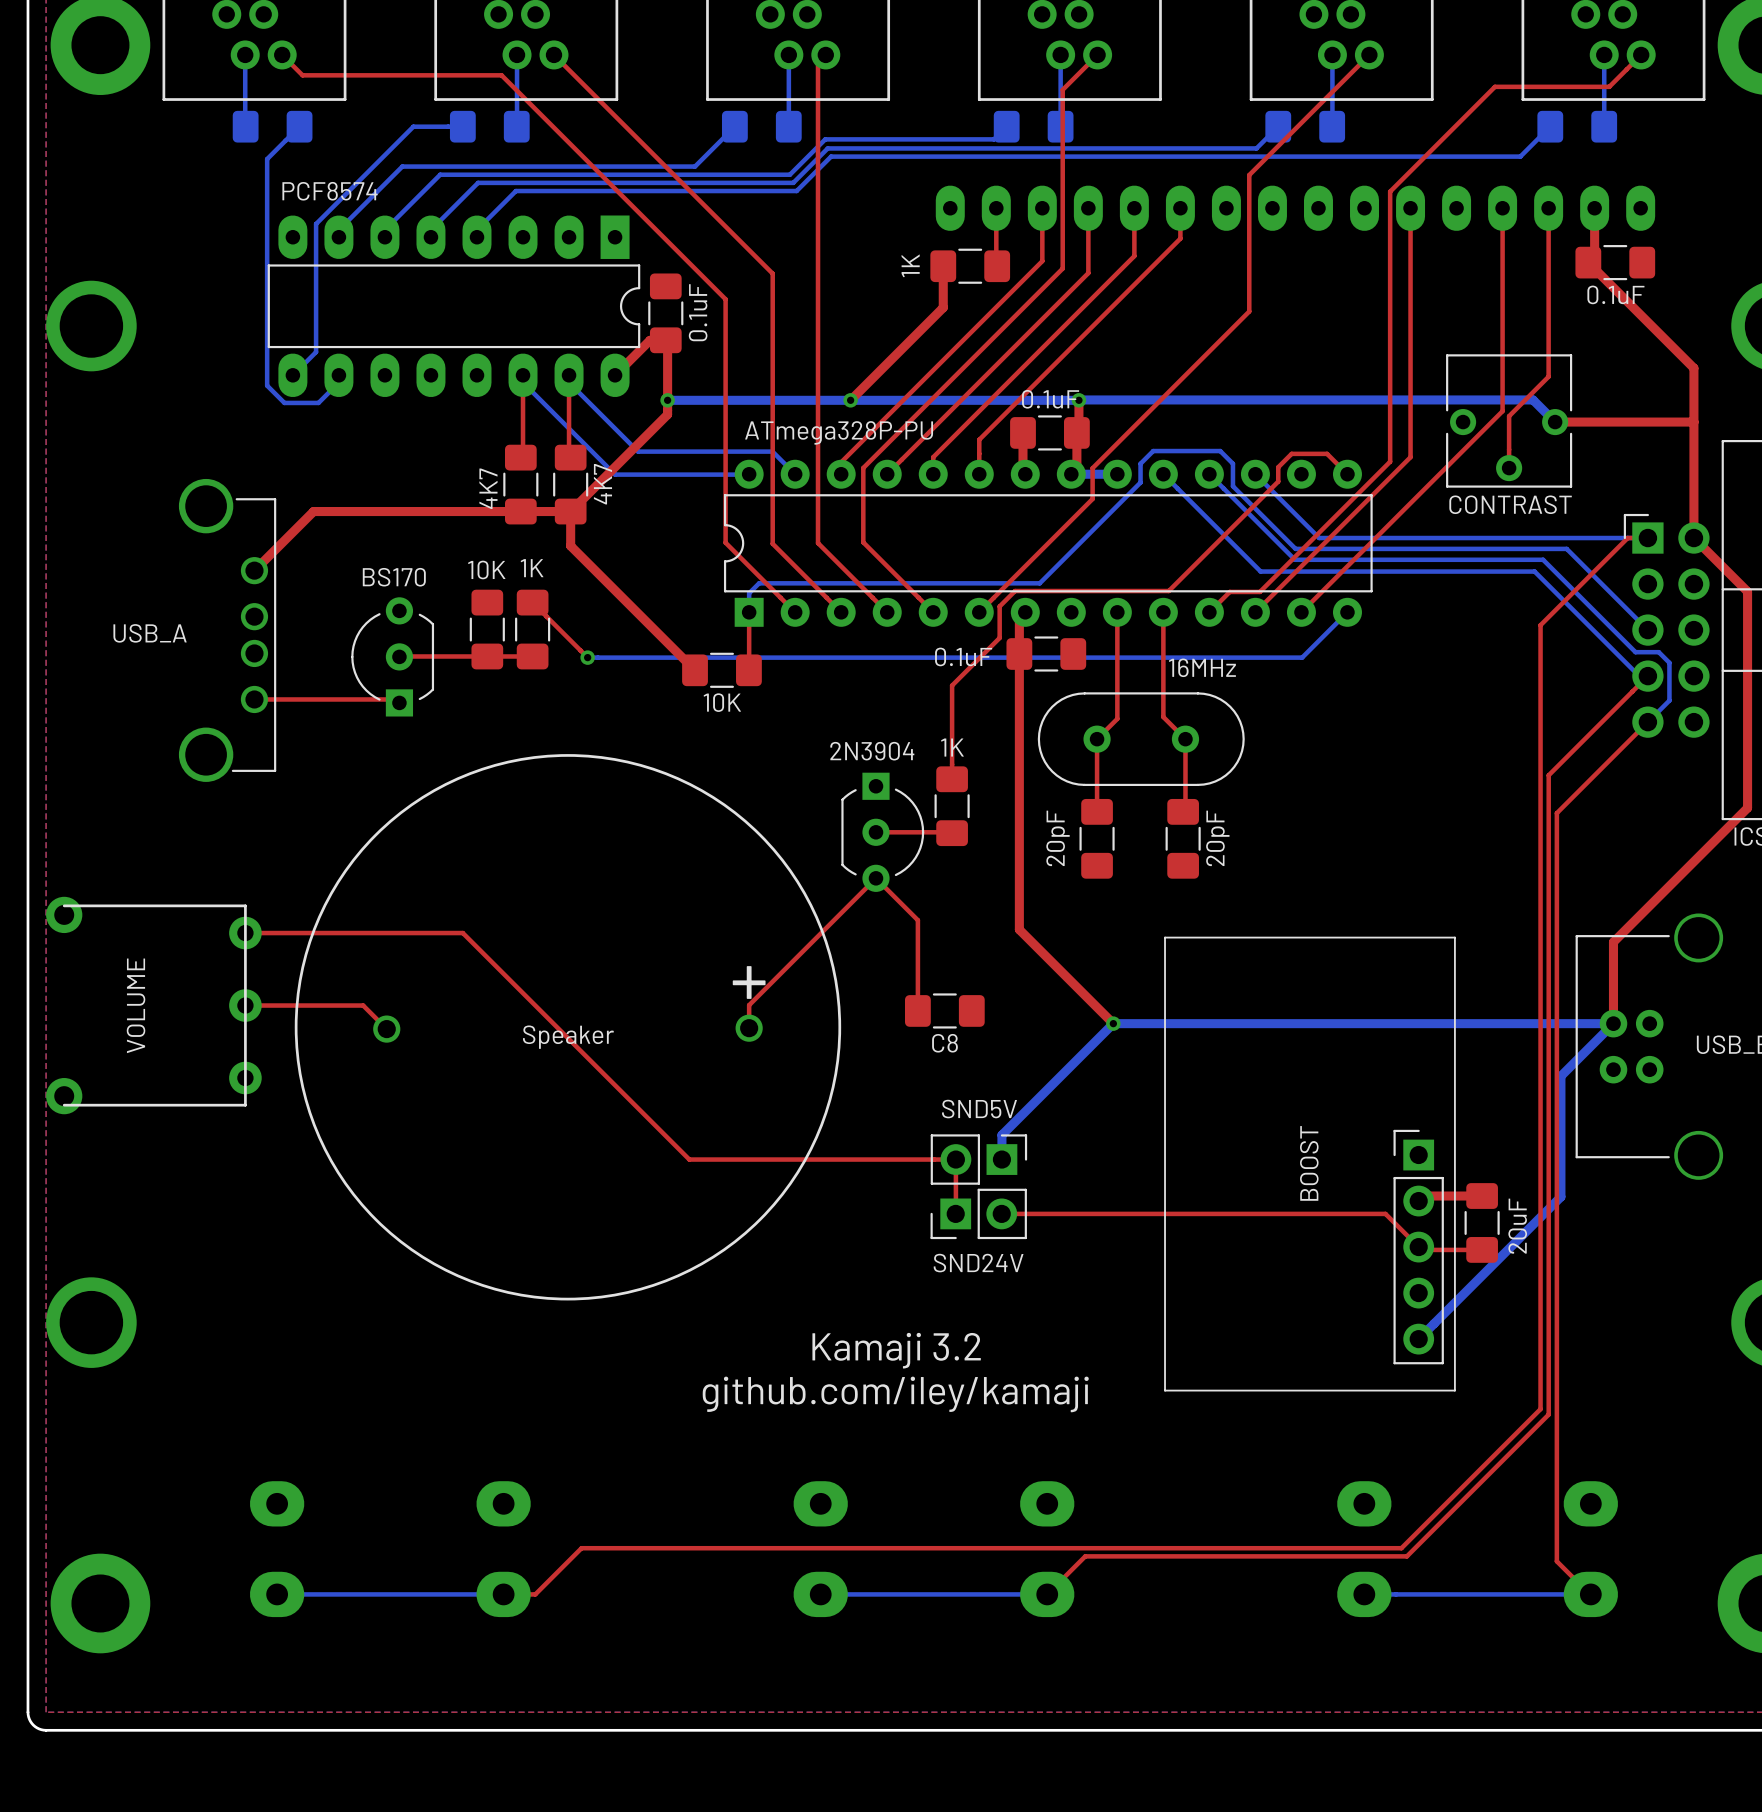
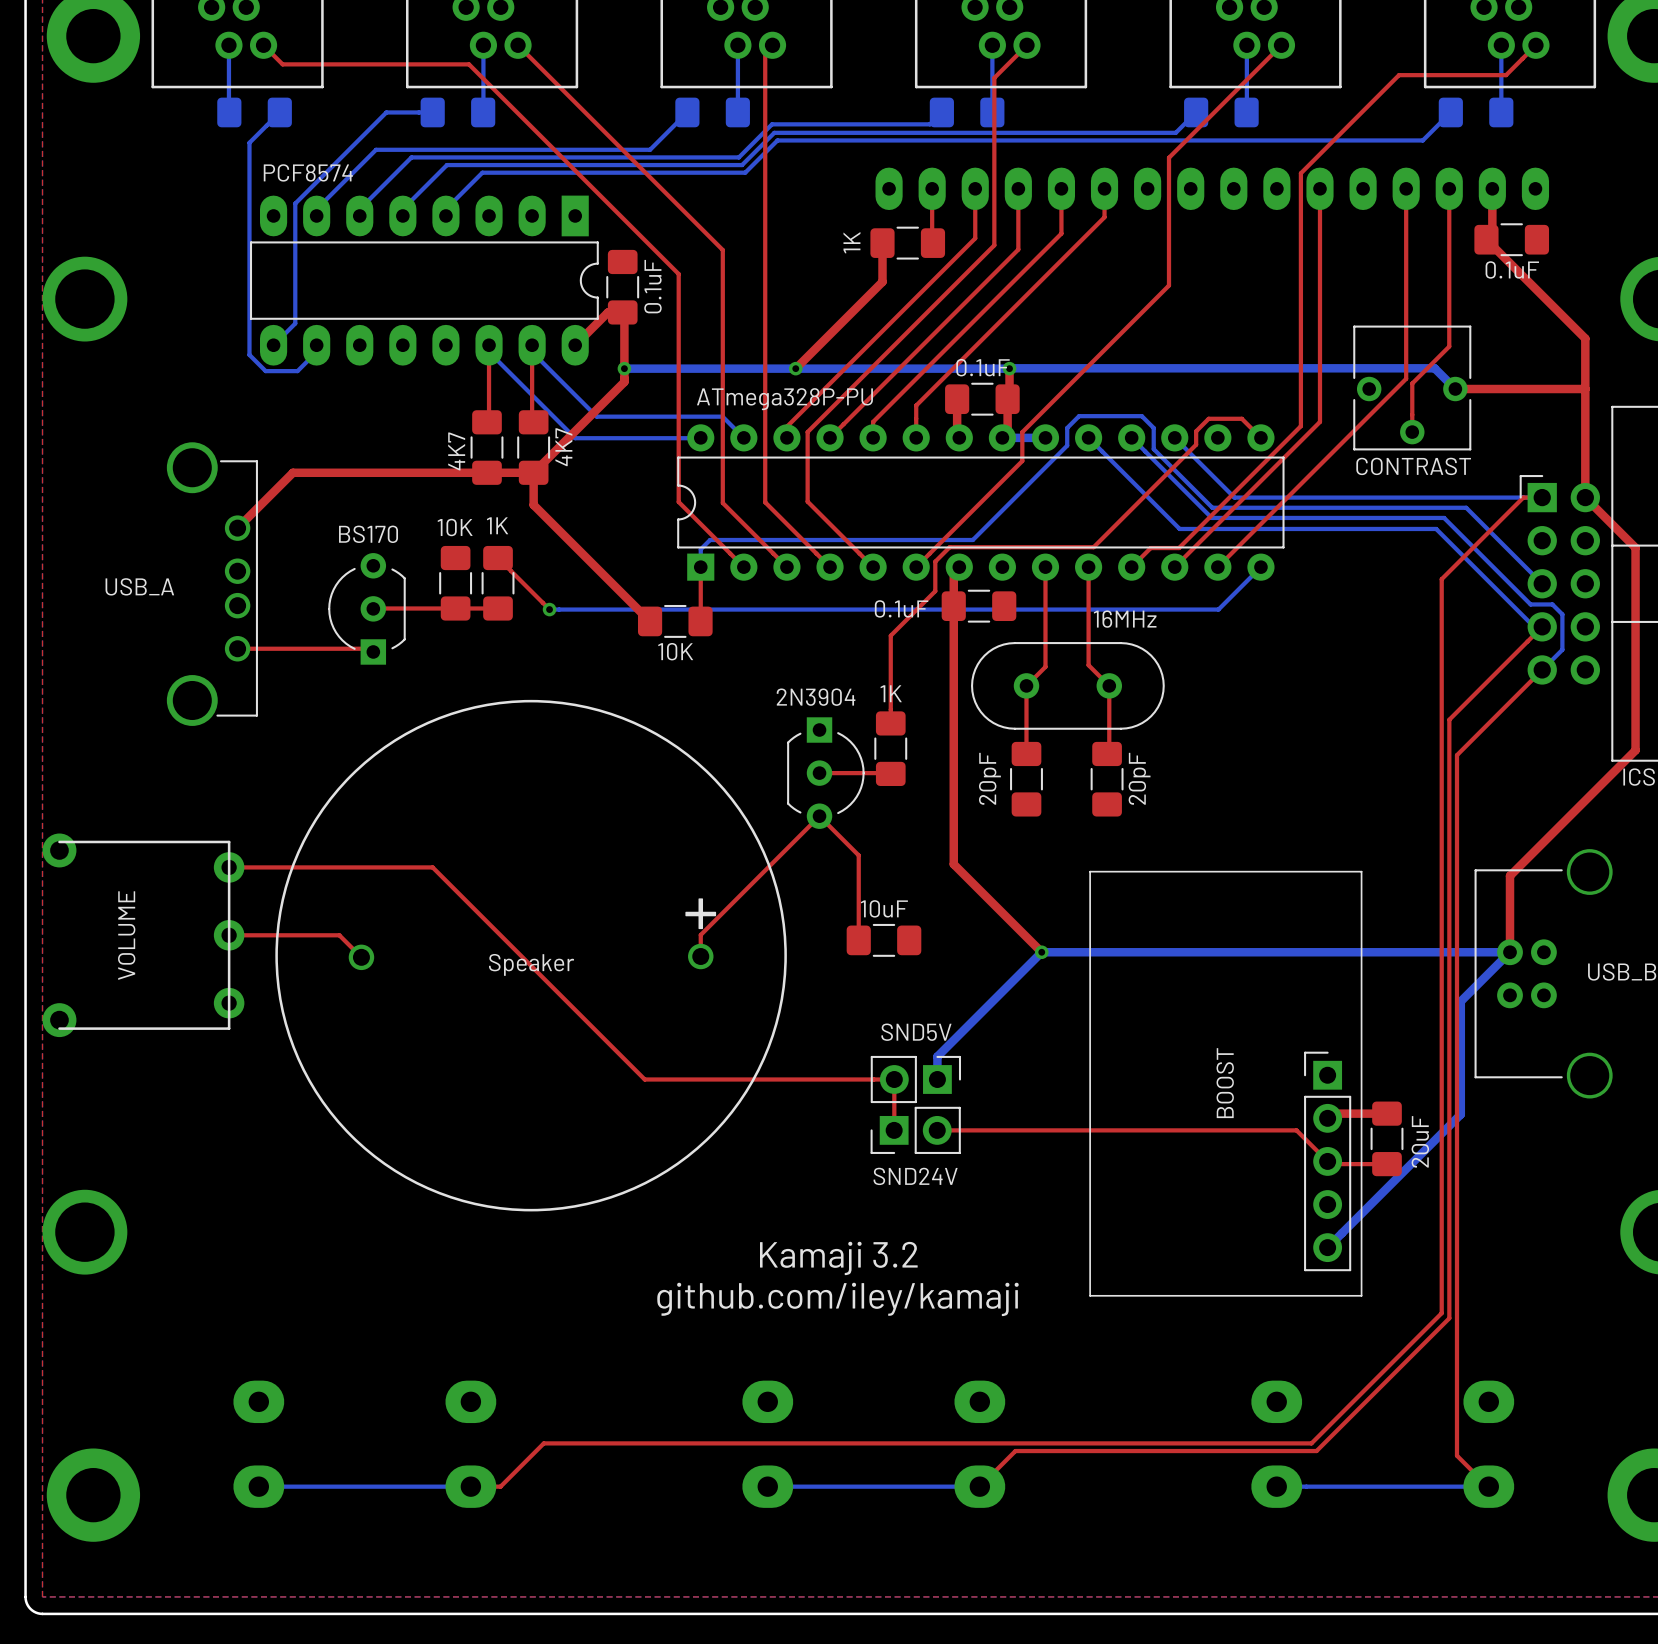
C8 value: none -> 10uF (884, 908)
C8 name: C8 (944, 1043) -> none

